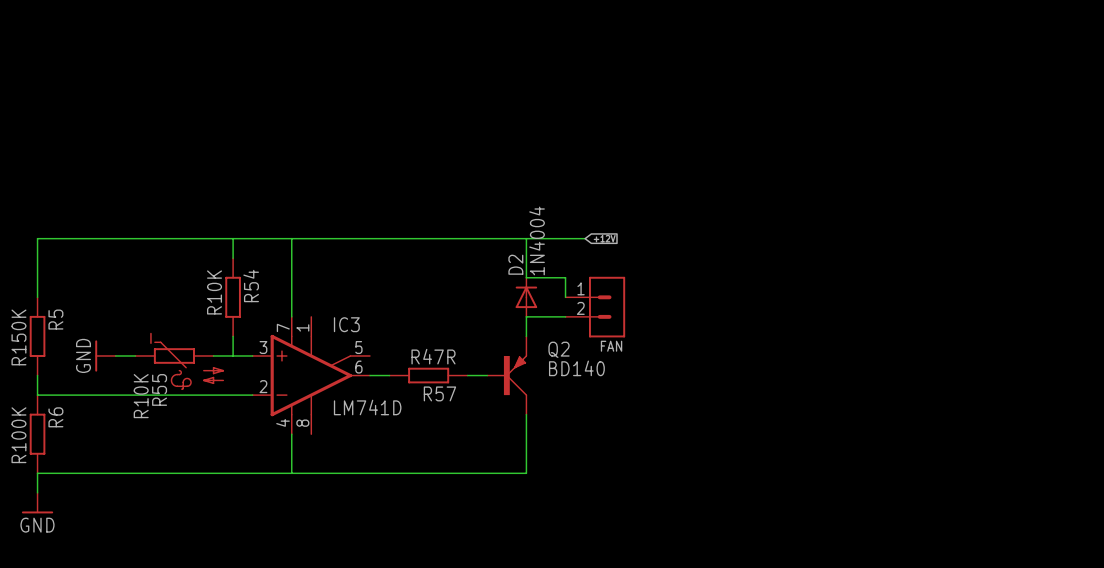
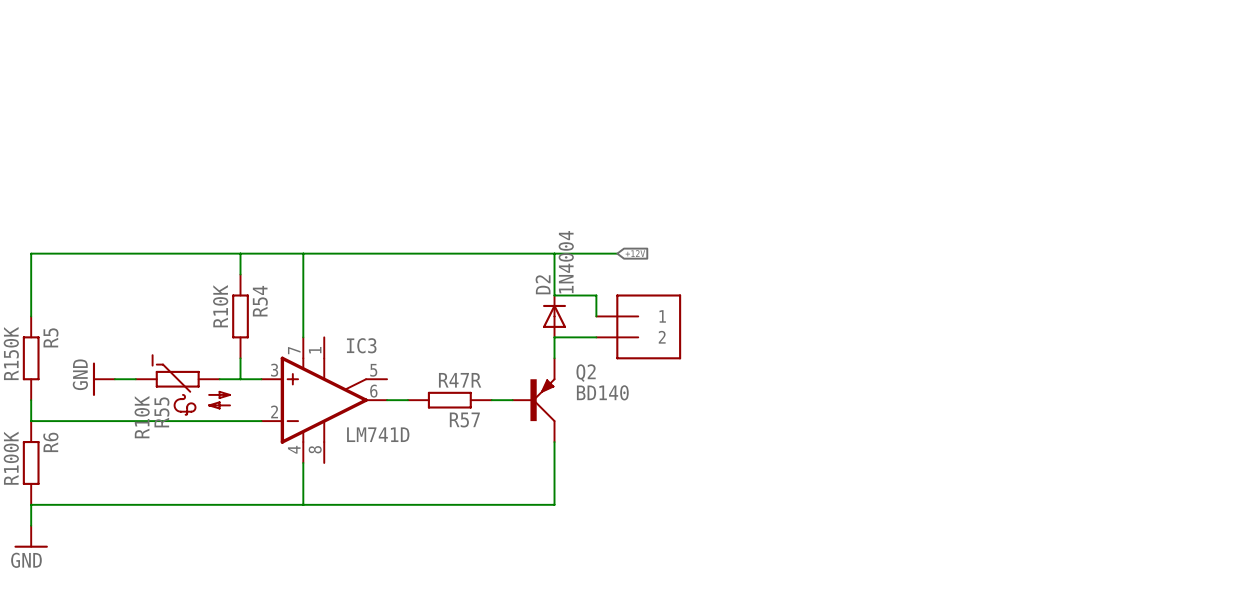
FAN: (595, 307) -> none
part: none -> (638, 326)

